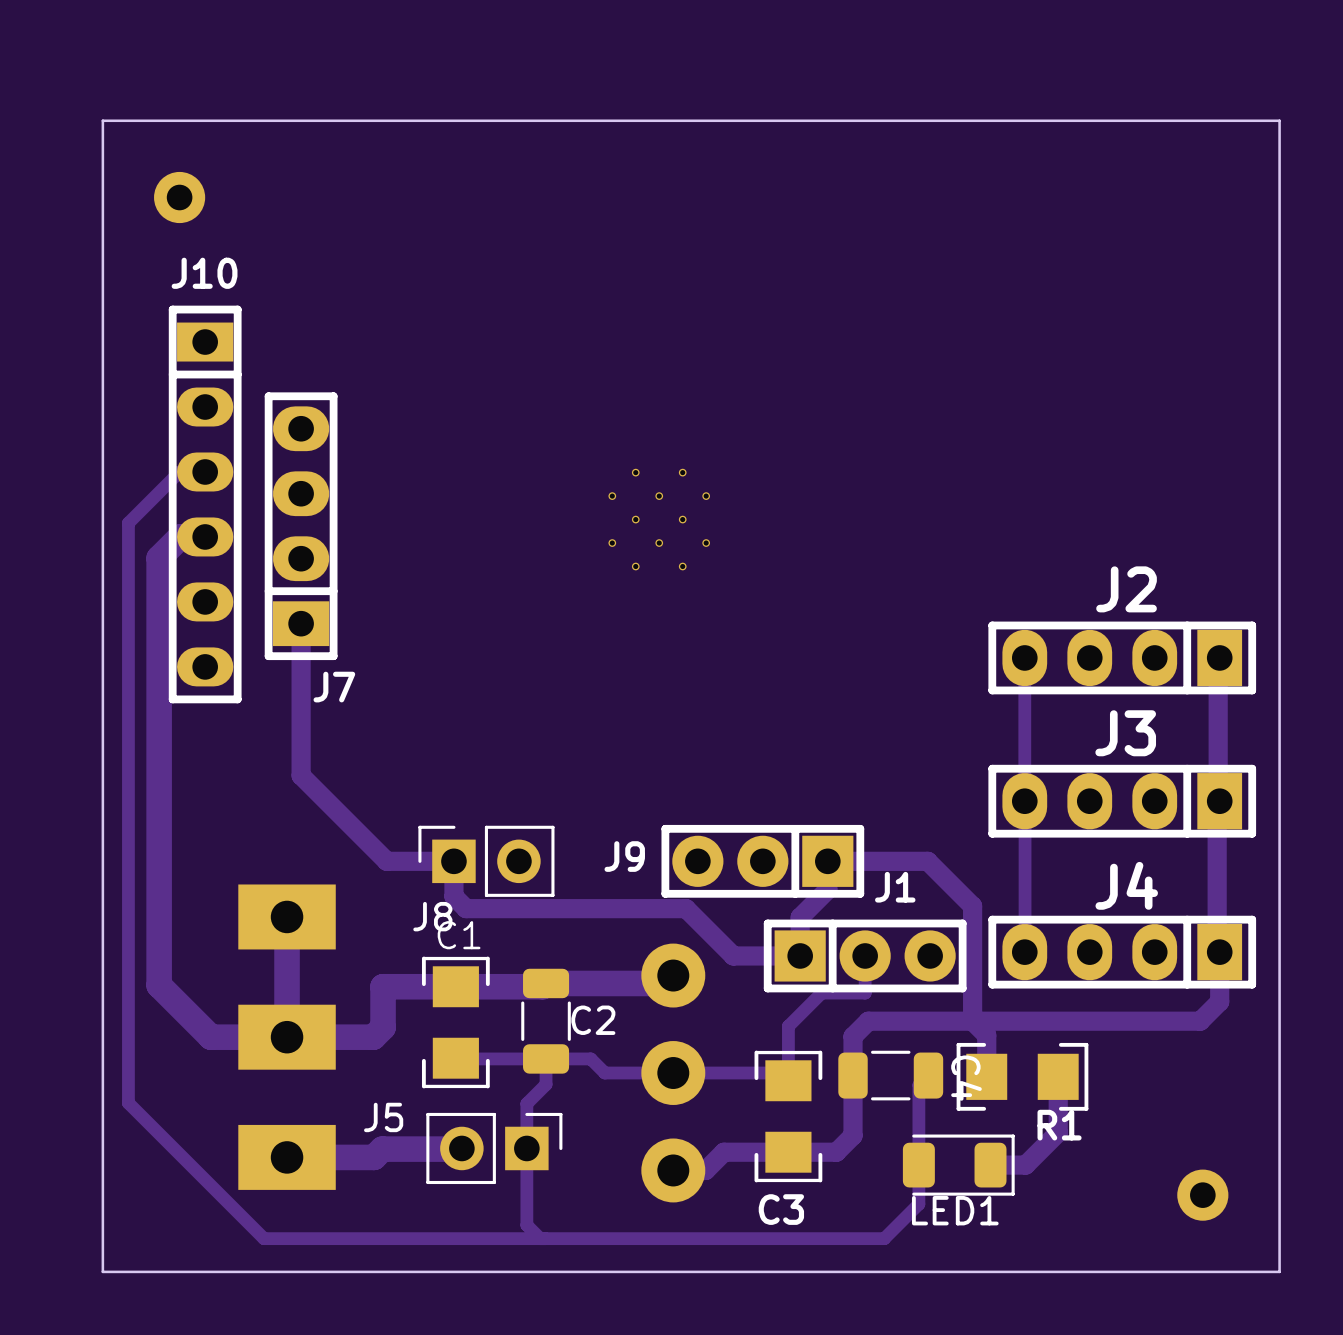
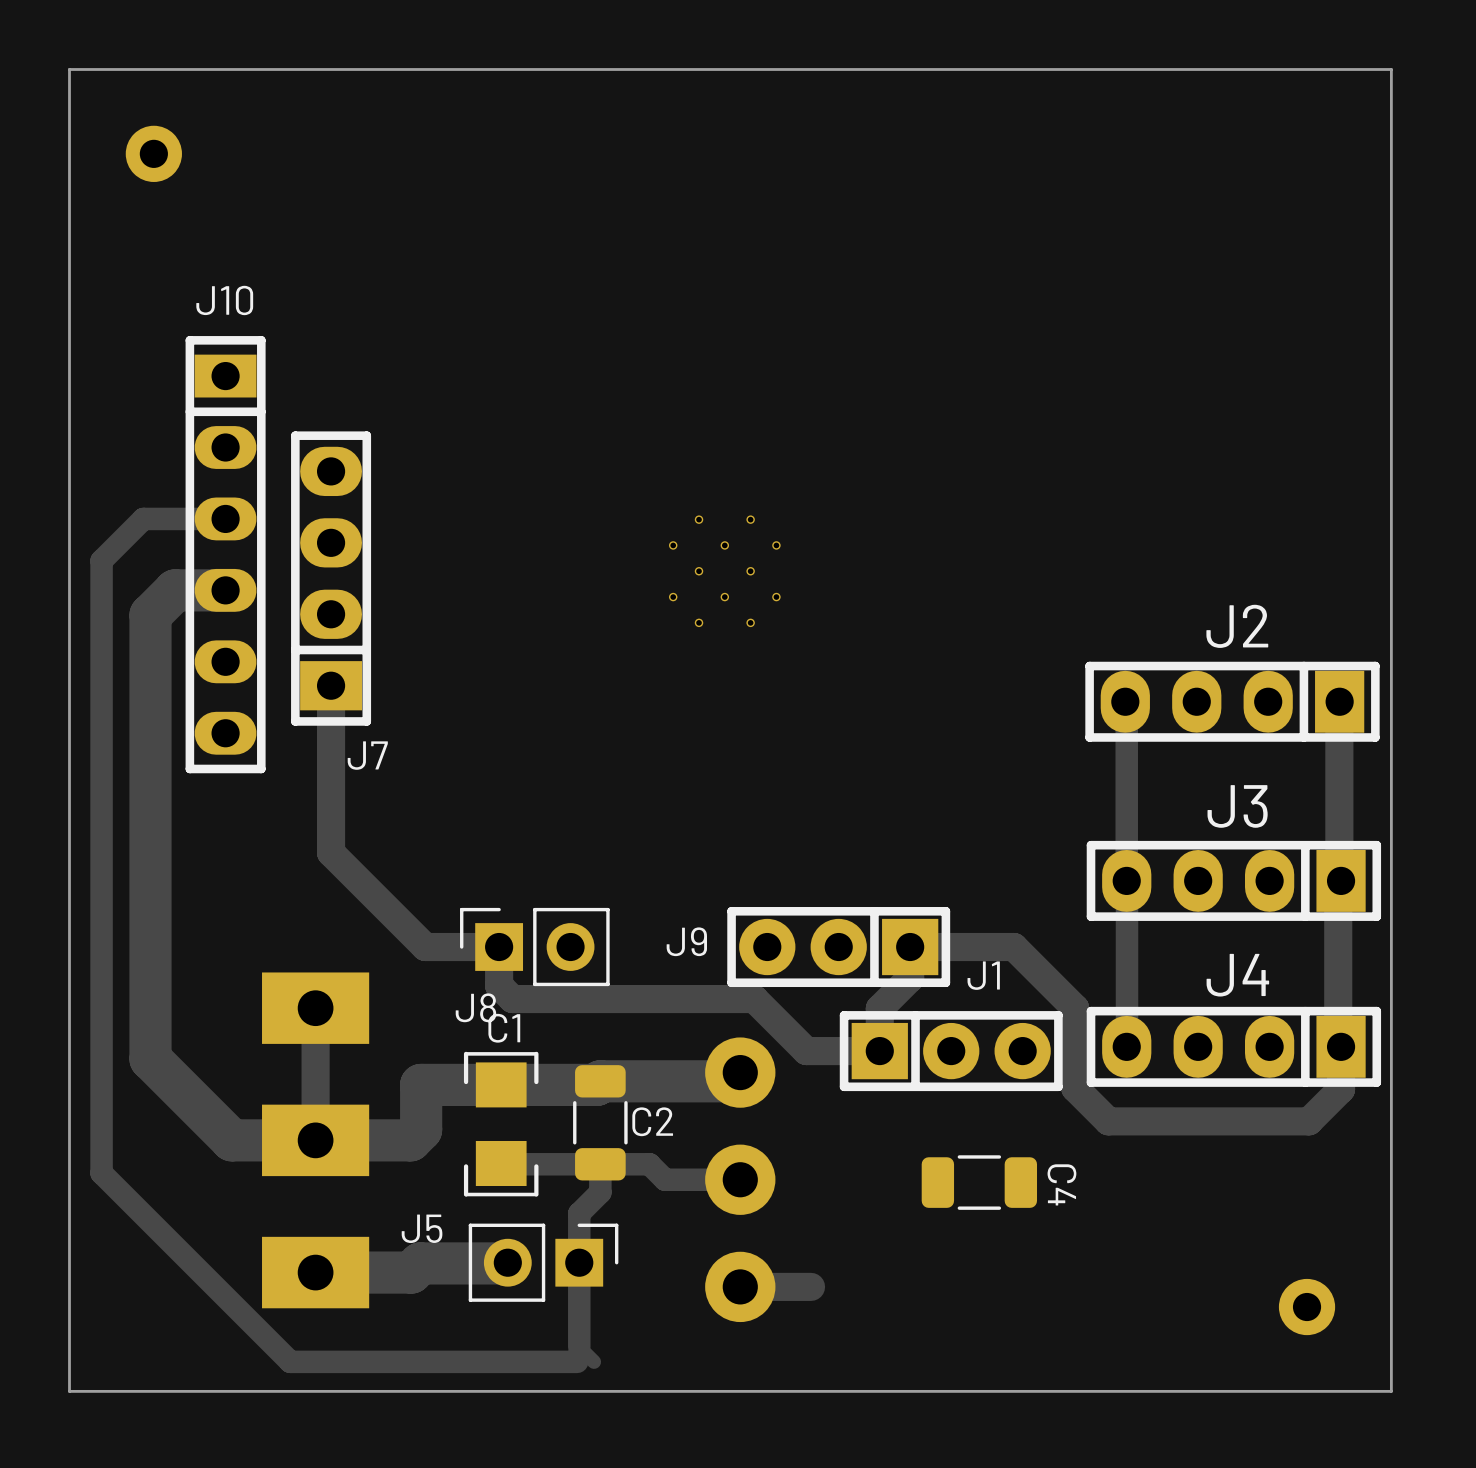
board edge: (1279, 120) (102, 120) (102, 1271) (1279, 1271) (1279, 120) -> (1391, 69) (1391, 1391) (69, 1391) (69, 69) (1391, 69)
part position: (179, 197) -> (153, 153)
track: (179, 471) (128, 523) (128, 1103) -> (197, 518) (143, 518) (101, 560) (101, 1173) (141, 1212)
track: (180, 536) (159, 558) (159, 985) -> (198, 590) (175, 590) (150, 615) (150, 1058) (174, 1083)
track width: thin (301, 623) (301, 775) (386, 861) (453, 861) (453, 896) (466, 908) (686, 908) (733, 955) (800, 955) (800, 917) (827, 889) (827, 861) (922, 861) -> thick (331, 685) (331, 852) (425, 947) (499, 947) (499, 985) (512, 999) (754, 999) (806, 1051) (879, 1051) (879, 1008) (910, 978) (910, 947) (1013, 947)
track width: thin (1024, 657) (1024, 801) -> thick (1126, 723) (1126, 880)
J2 position: (1122, 657) -> (1232, 701)
track width: thin (1218, 659) (1218, 799) (1219, 801) (1217, 803) (1217, 949) (1219, 952) (1219, 990) -> thick (1339, 725) (1339, 879) (1341, 880) (1338, 883) (1338, 1044) (1341, 1046) (1341, 1089)
track width: thin (1025, 801) (1025, 951) -> thick (1127, 881) (1127, 1046)
track: (922, 861) (927, 861) (972, 906) (972, 1021) (986, 1035) (986, 1076) -> (1013, 947) (1075, 1008) (1075, 1088) (1108, 1121) (1308, 1121) (1341, 1089)
track: (865, 955) (865, 993) (821, 993) (788, 1026) (788, 1080) (780, 1073) (673, 1073) -> none
track width: thin (673, 975) (665, 983) (546, 983) (542, 986) (383, 986) (383, 1027) (373, 1037) (210, 1037) (159, 985) -> thick (740, 1072) (731, 1081) (600, 1081) (596, 1084) (421, 1084) (421, 1129) (410, 1140) (231, 1140) (174, 1083)
track: (1219, 990) (1219, 1001) (1200, 1021) (868, 1021) (853, 1036) (853, 1135) (836, 1152) (723, 1152) (705, 1170) -> (811, 1286) (775, 1286)
track width: thin (455, 1058) (590, 1058) (604, 1073) (673, 1073) -> thick (501, 1163) (649, 1164) (665, 1179) (740, 1179)
track width: thin (545, 1058) (546, 1084) (526, 1103) (526, 1225) -> thick (599, 1163) (600, 1192) (579, 1213) (579, 1347)
track: (928, 1075) (918, 1085) (918, 1204) (884, 1238) (524, 1238) -> none
R1: (1022, 1076) -> none
track: (1058, 1076) (1058, 1132) (1025, 1165) (990, 1165) -> none
track width: thin (128, 1103) (264, 1238) (524, 1238) -> thick (141, 1212) (290, 1361) (577, 1361)
C3: (788, 1116) -> none
track width: thin (461, 1148) (382, 1149) (374, 1157) (287, 1157) -> thick (507, 1262) (420, 1263) (411, 1272) (315, 1272)
LED1: (958, 1165) -> none
part position: (1202, 1195) -> (1307, 1307)

